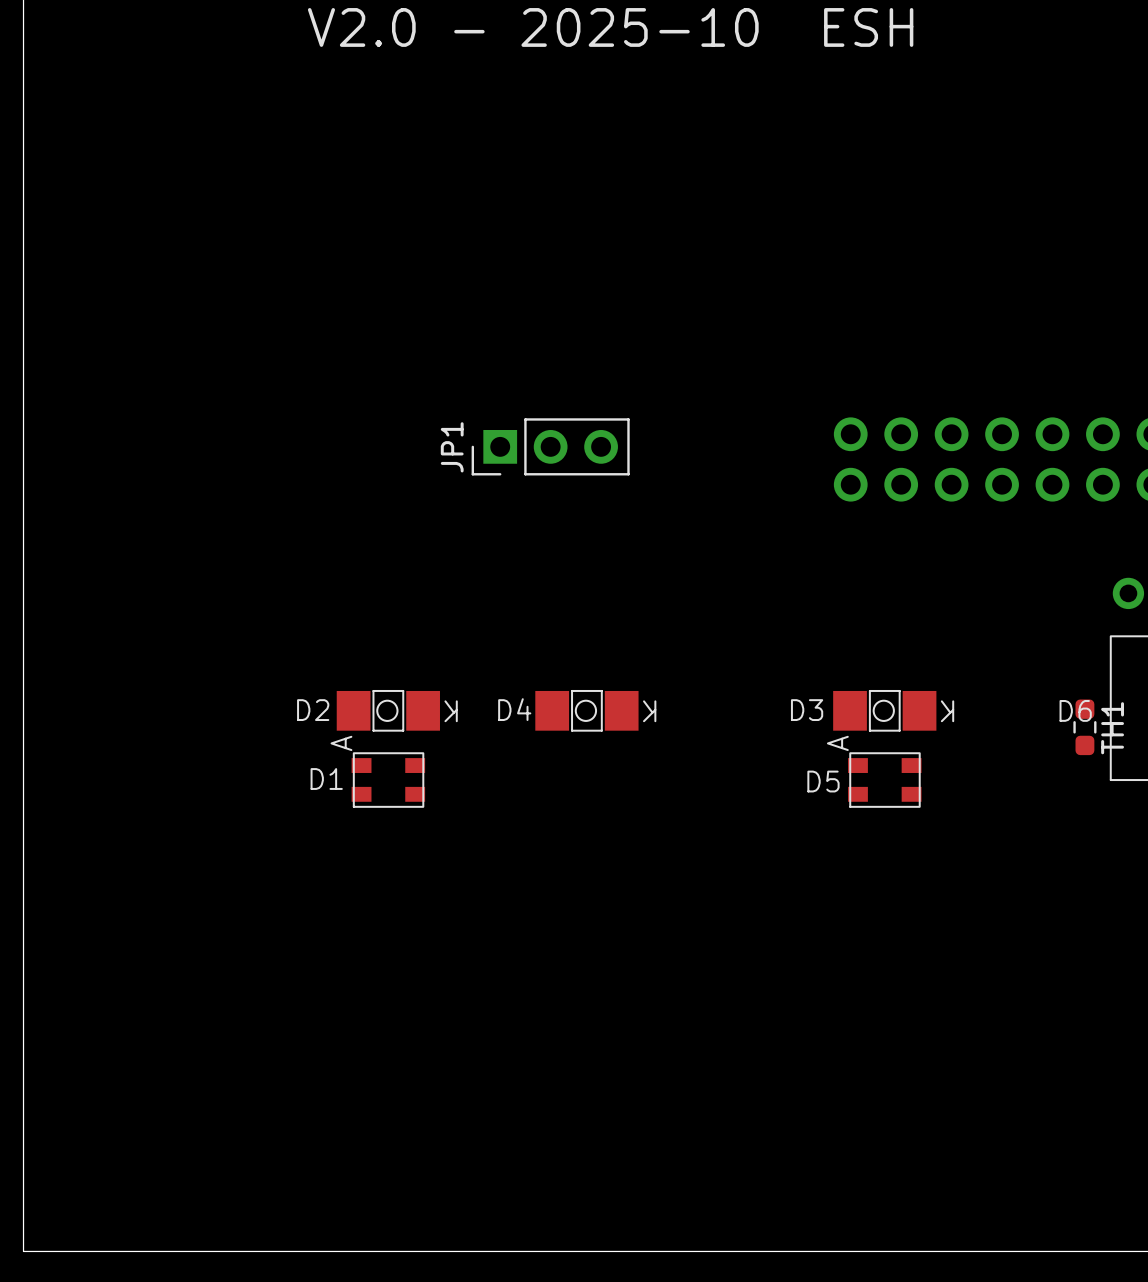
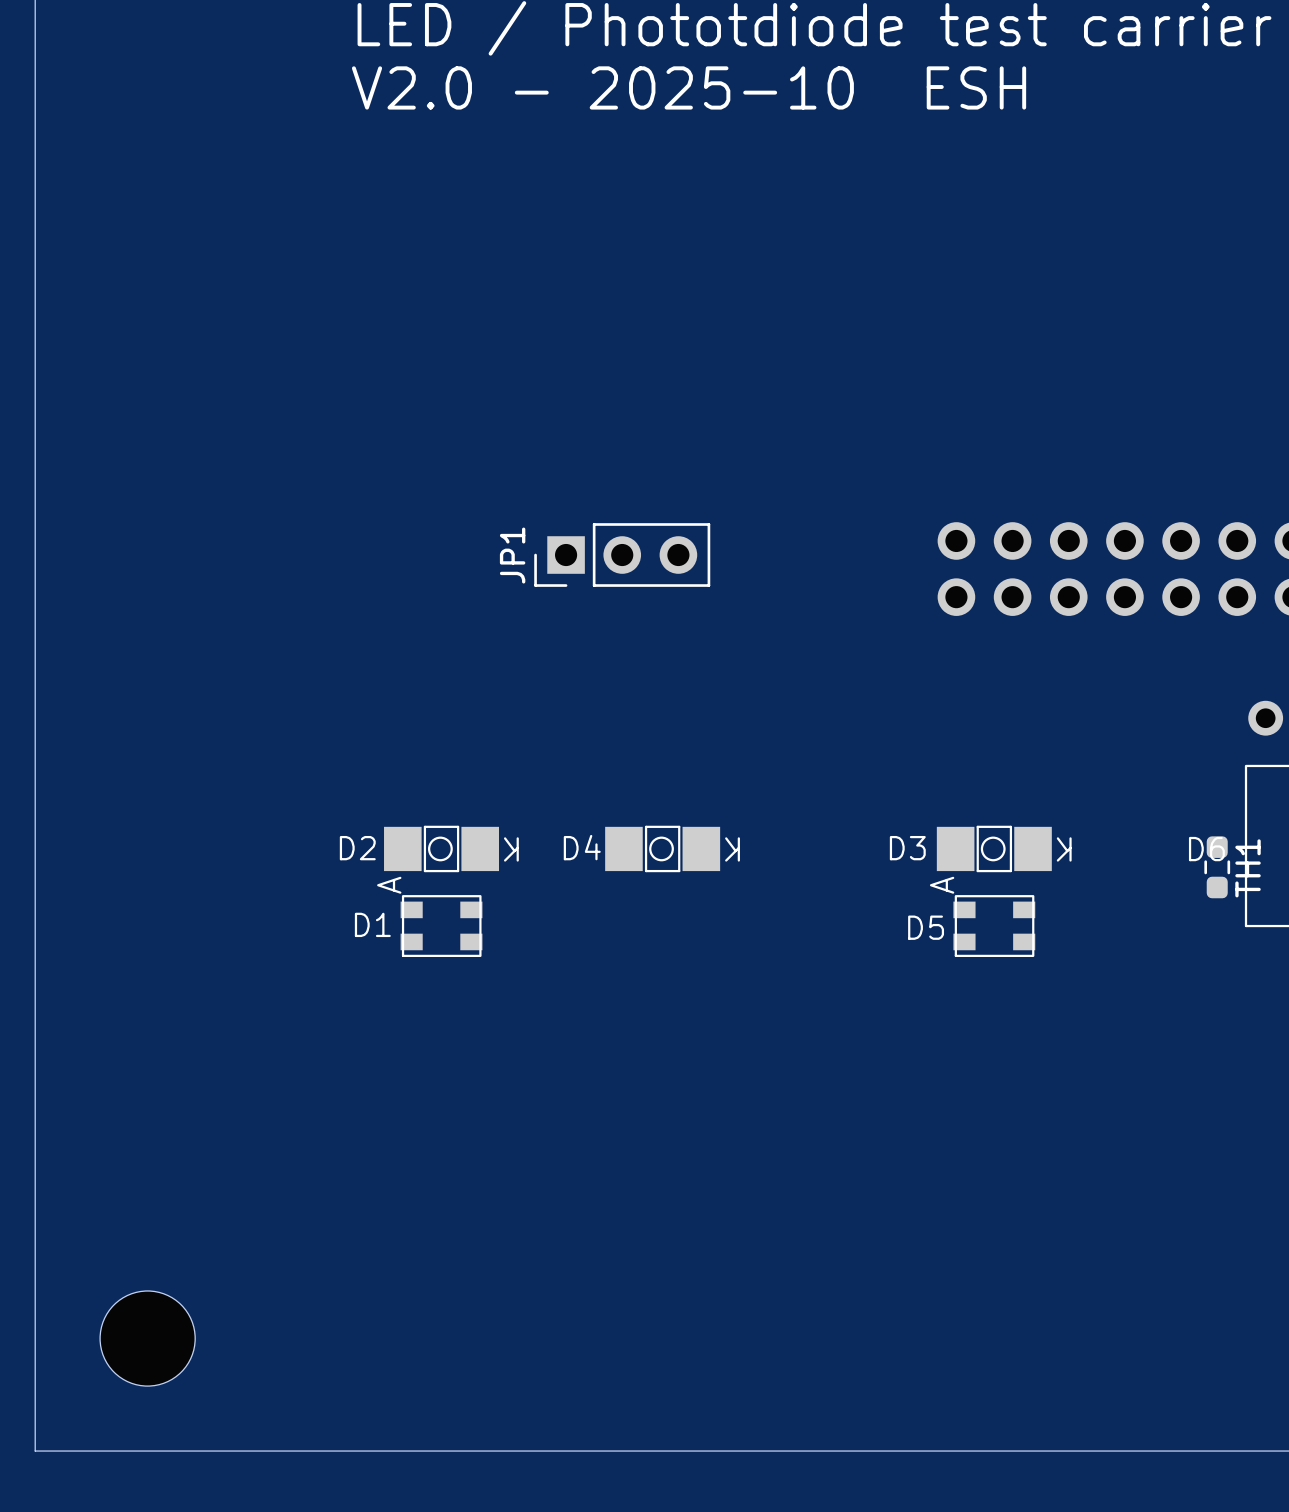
part: none -> (147, 1338)

